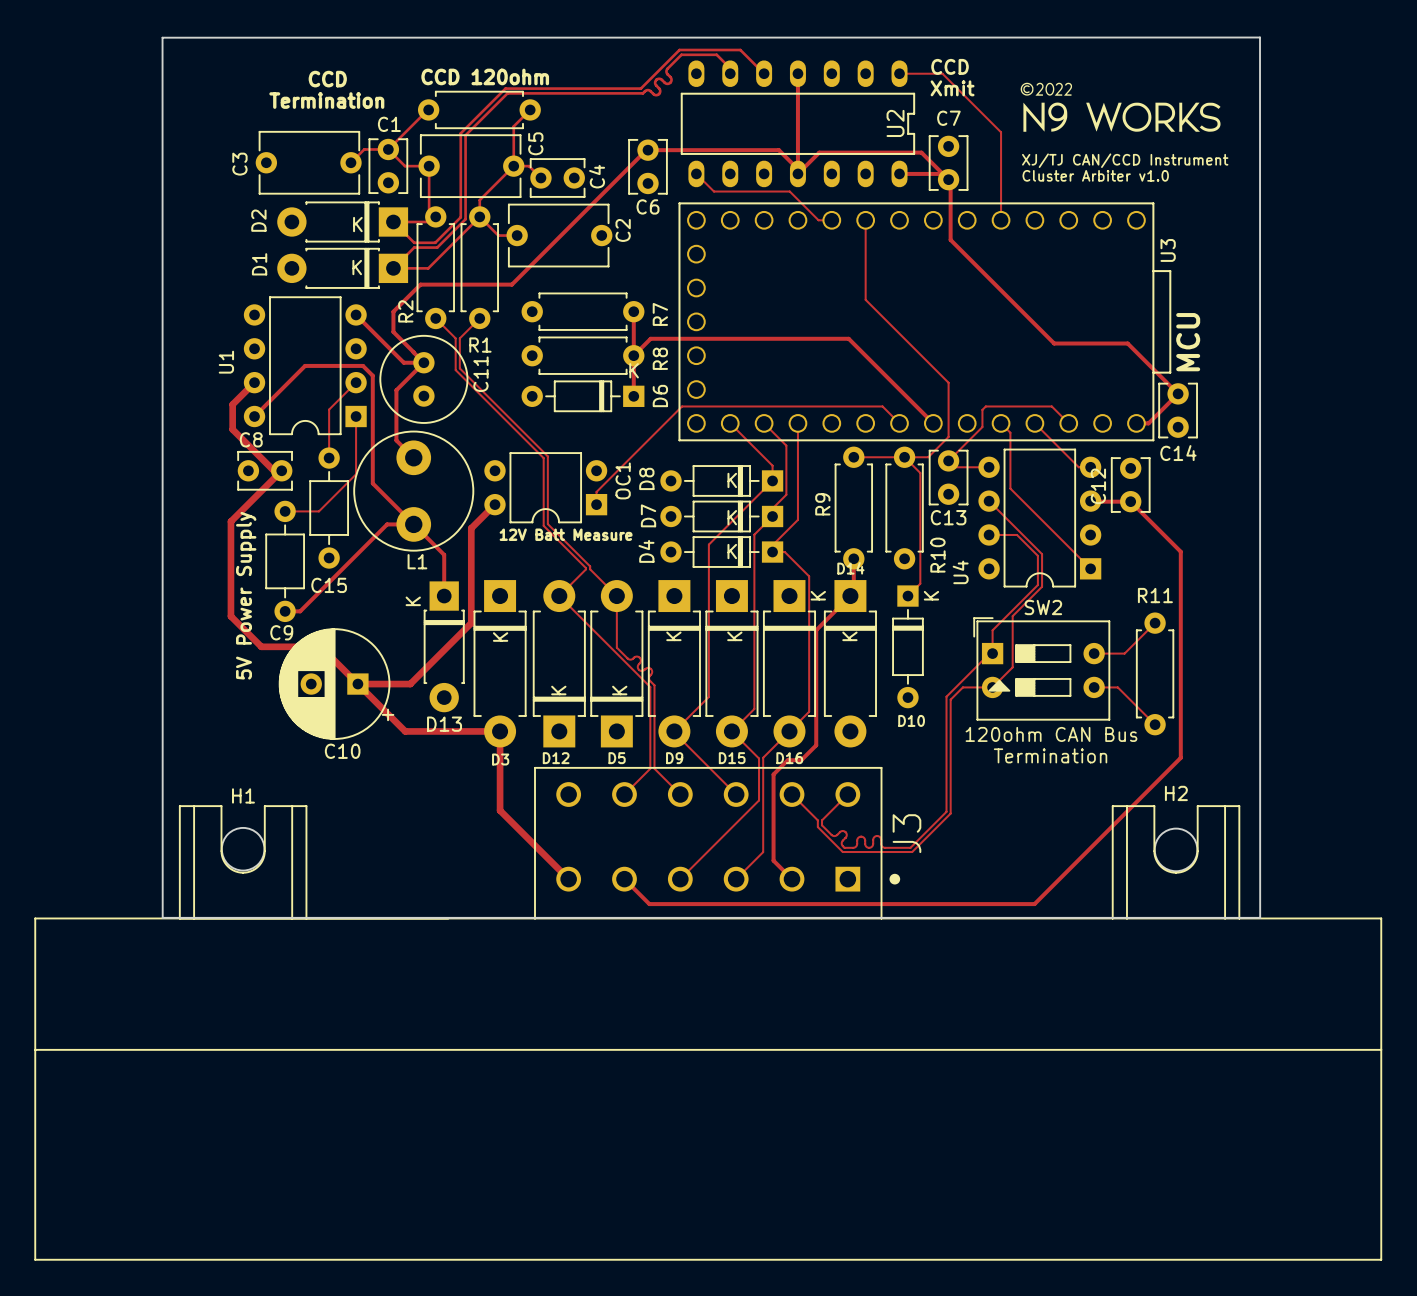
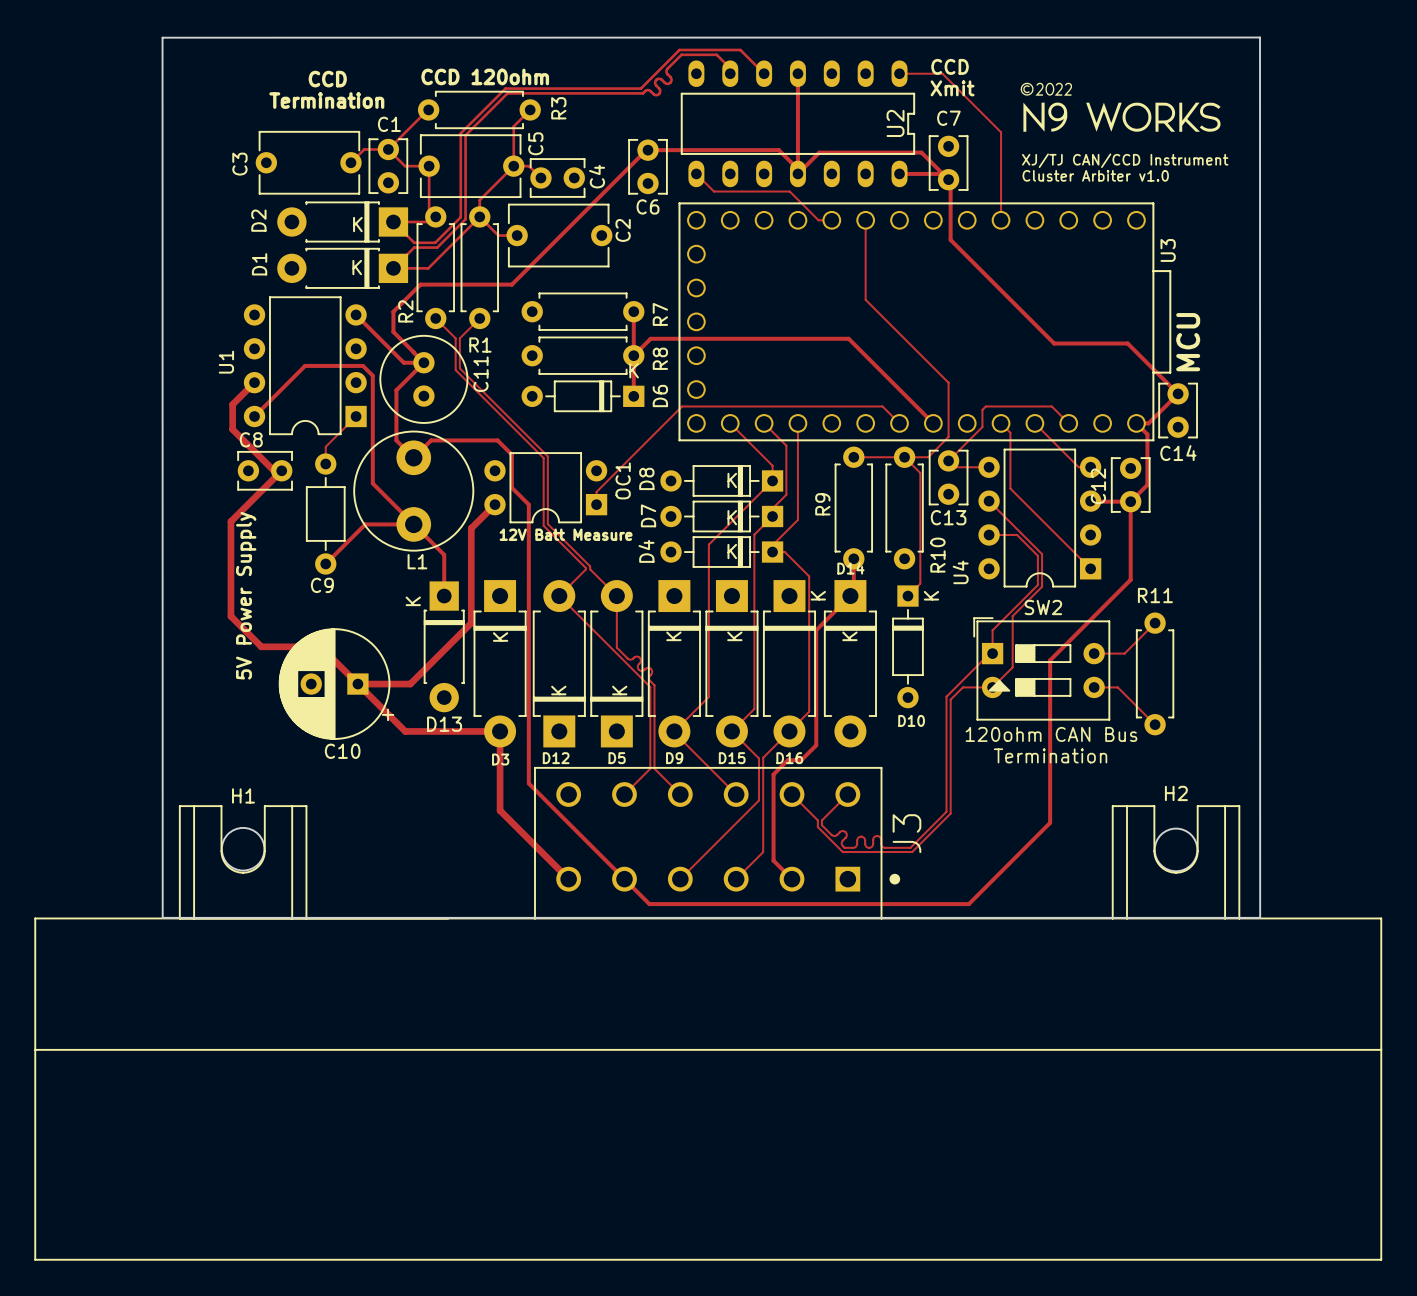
R3 name: none -> R3 (558, 108)
track: (356, 382) (329, 409) (329, 458) -> none
track: (356, 416) (356, 474) (318, 511) (285, 511) -> (356, 416) (325, 446) (325, 464)
track: none -> (413, 457) (431, 440) (497, 440) (511, 454) (511, 487) (528, 504) (528, 783) (624, 879)
track: (1130, 501) (1180, 551) (1180, 757) (1034, 904) (968, 904) -> (1136, 423) (1147, 434) (1147, 484) (1130, 501) (1130, 579) (1050, 660) (1050, 822) (968, 904)
C15: (329, 508) -> none
track: (387, 524) (300, 611) (285, 611) -> (387, 524) (365, 524) (325, 563)
C9 position: (285, 561) -> (325, 514)

